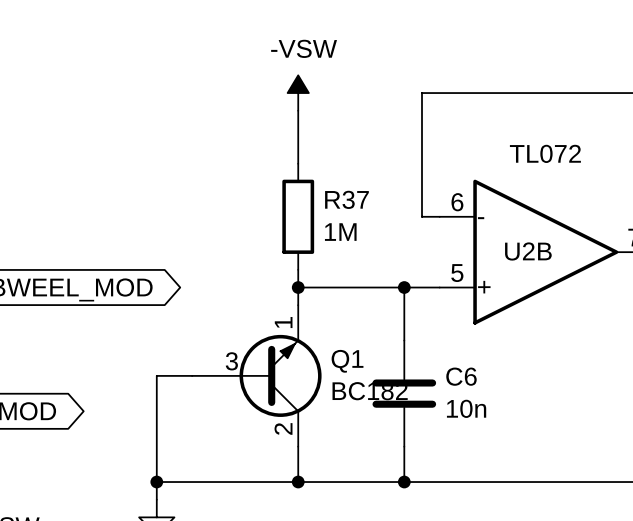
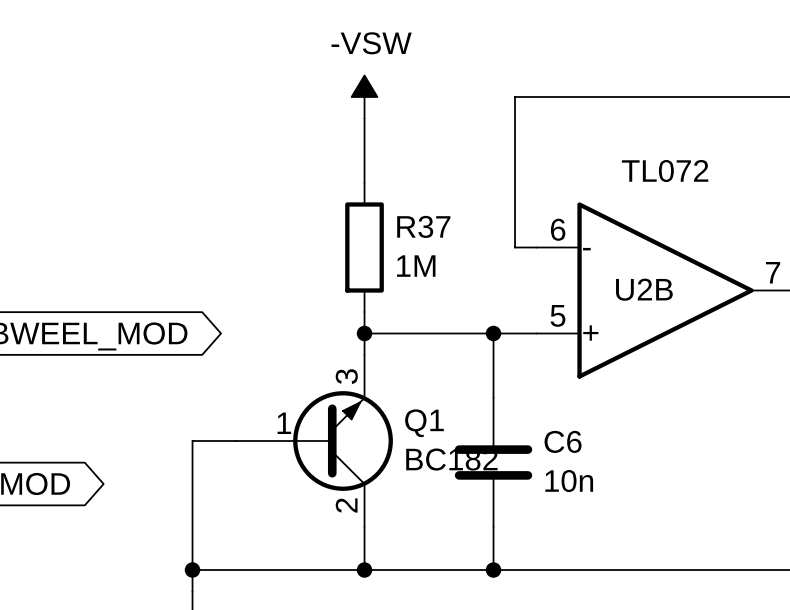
Q1 pin number: 1 (283, 322) -> 3 (346, 376)
Q1 pin number: 3 (231, 361) -> 1 (284, 423)

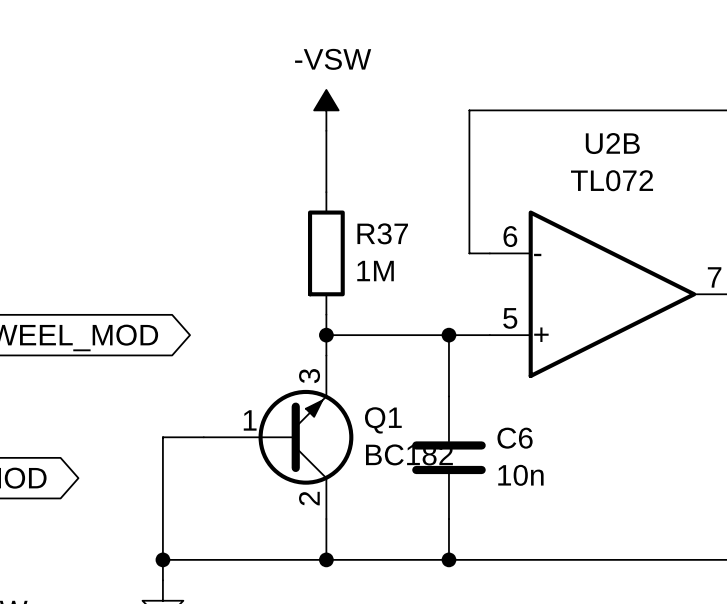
U2B name position: U2B (644, 289) -> U2B (612, 143)

